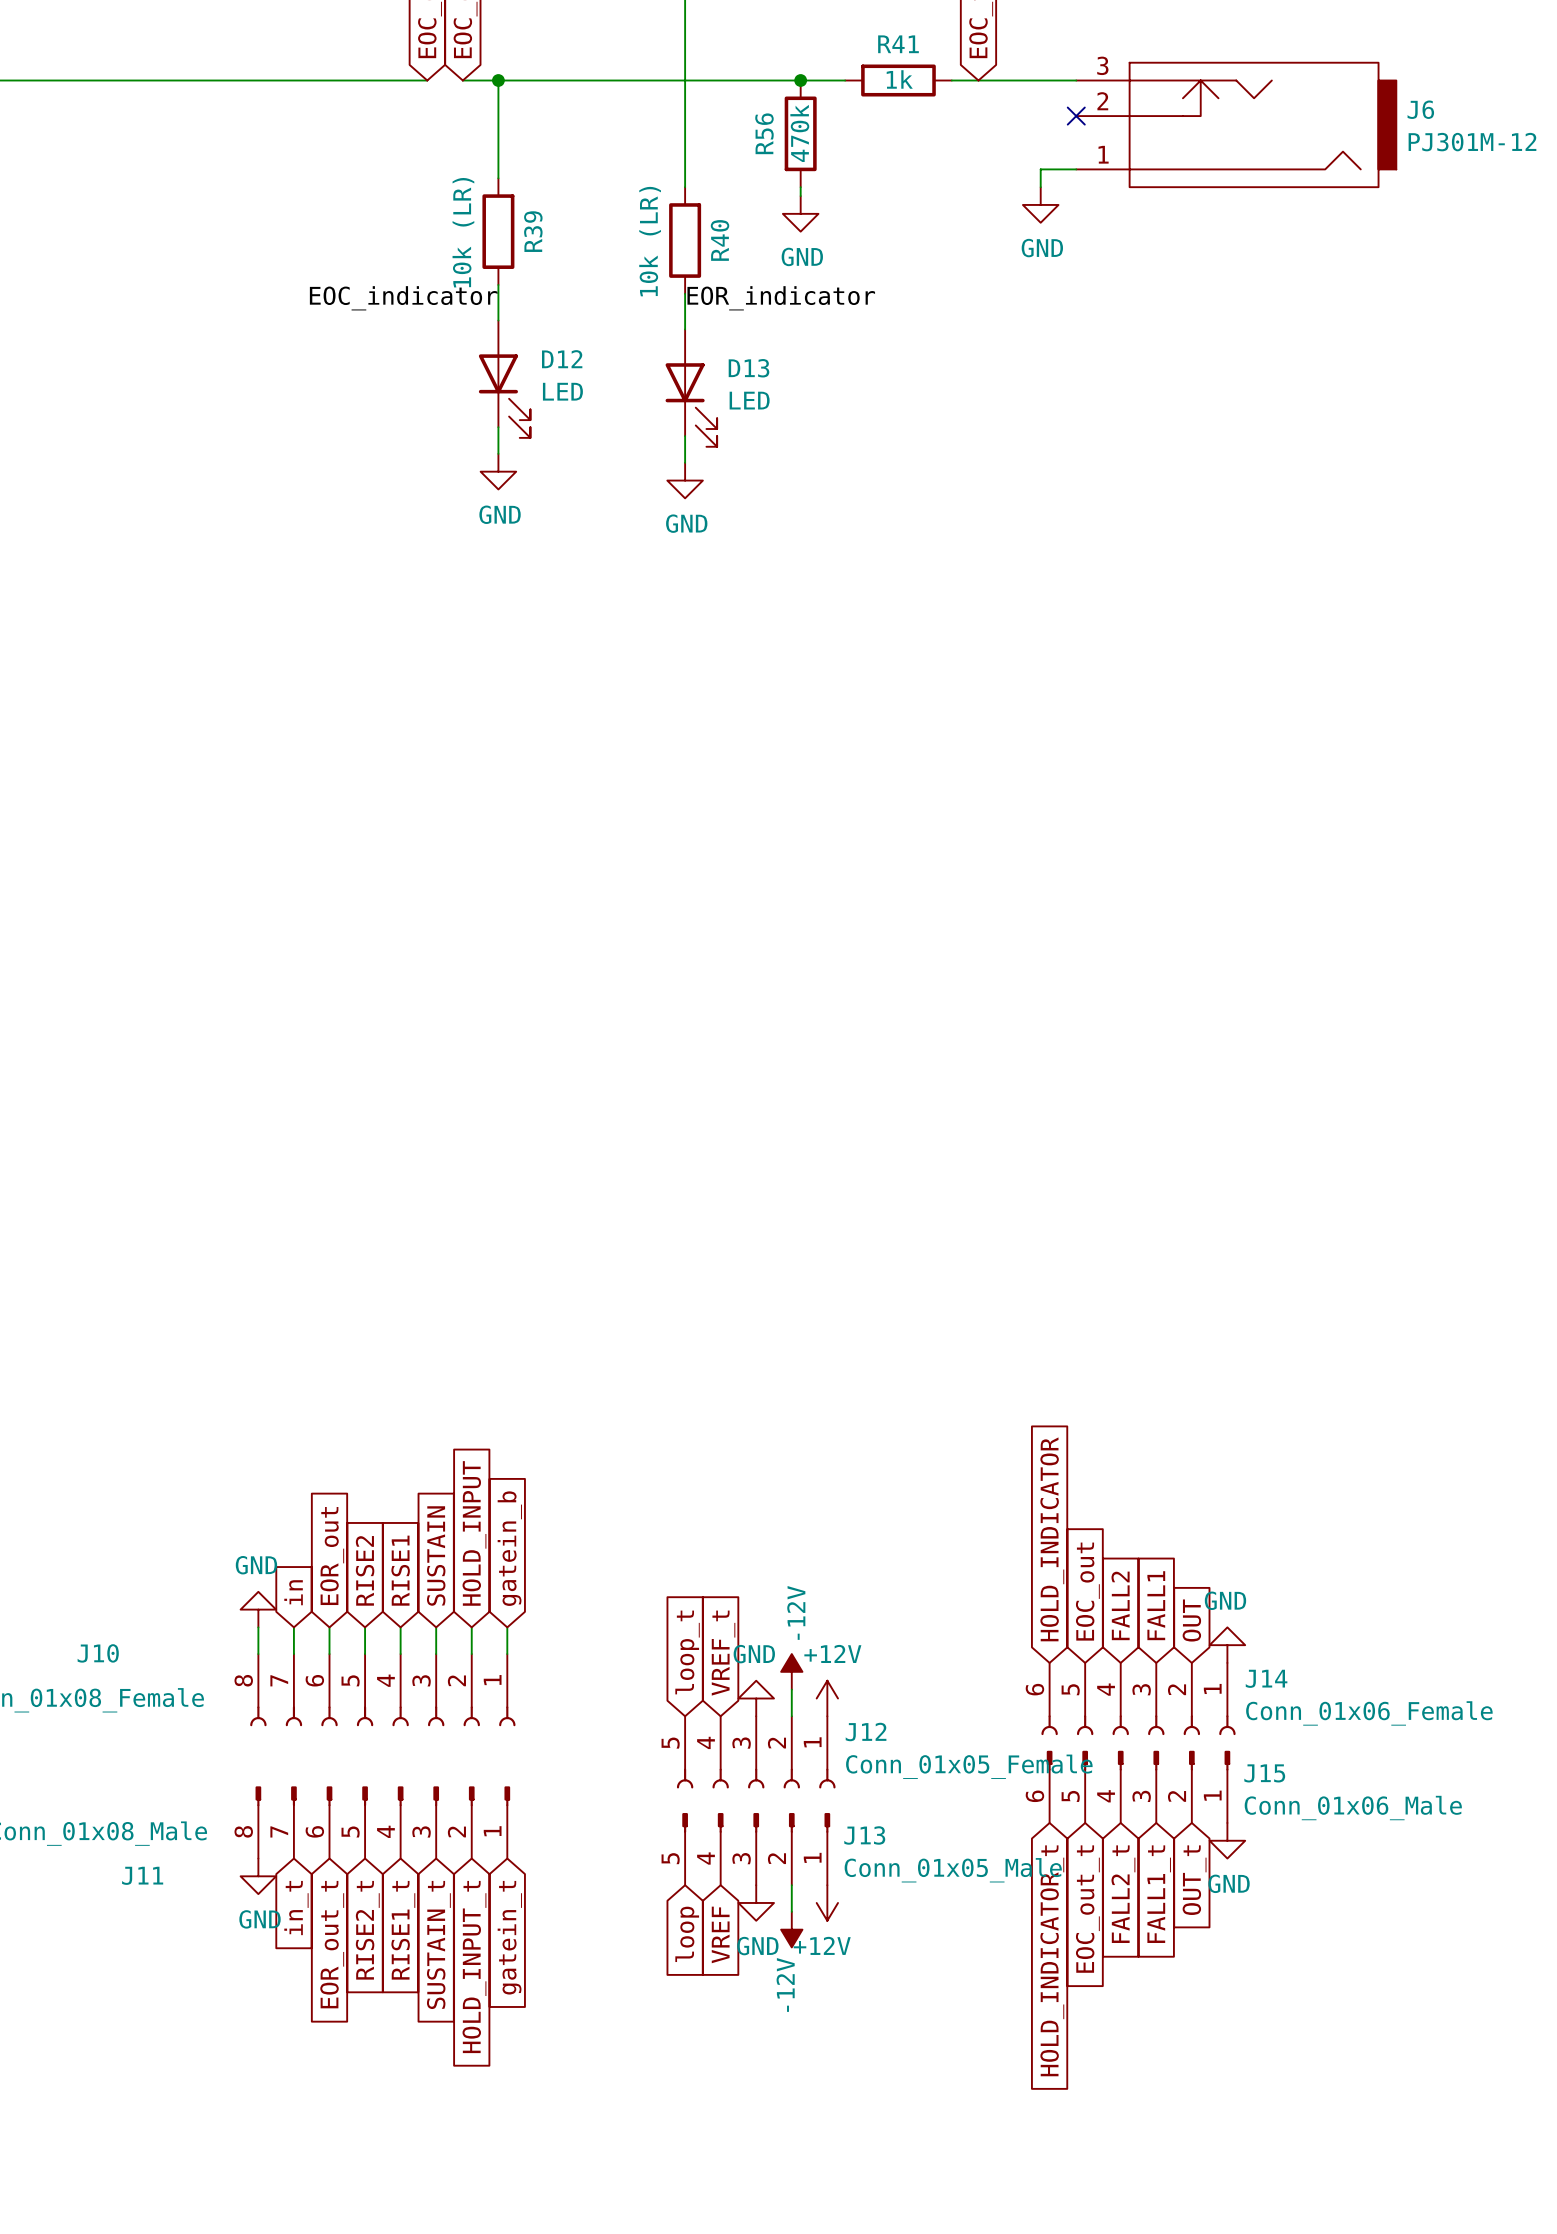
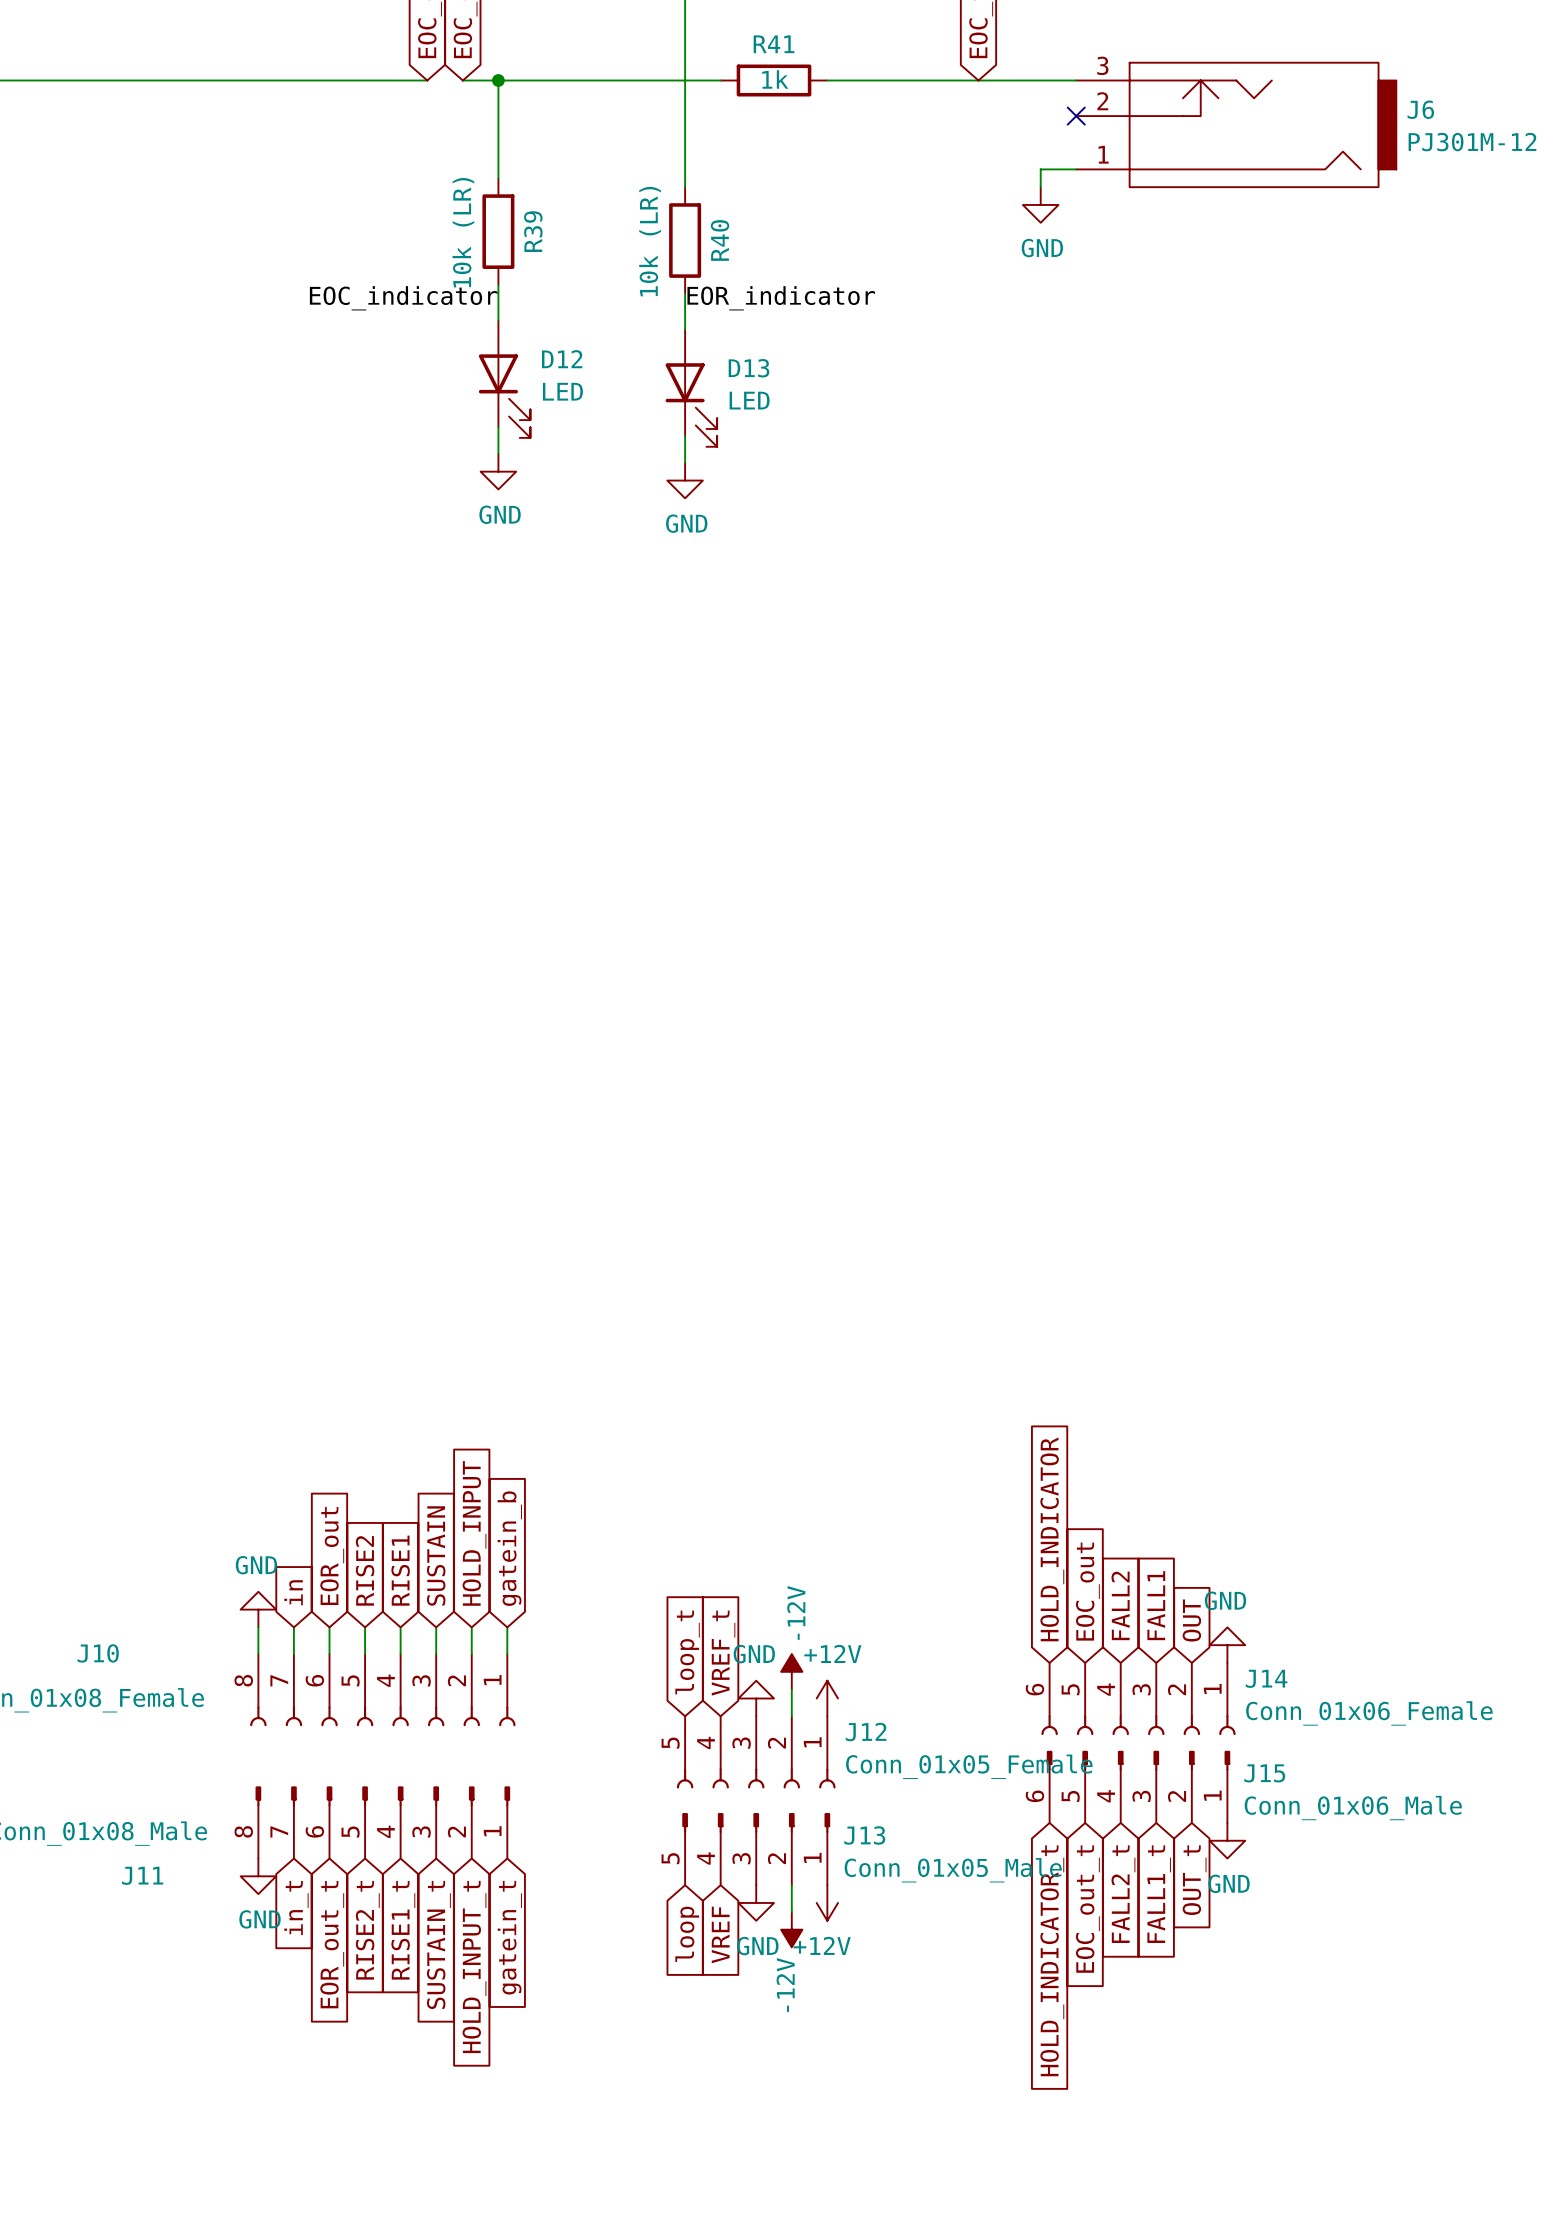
wire: (720, 80) (827, 80) -> (845, 80) (951, 80)
junction: (800, 80) -> none
R41 position: (898, 80) -> (774, 80)
R56: 470k (800, 133) -> none
wire: (800, 187) (800, 196) -> none
power symbol: GND (800, 213) -> none

